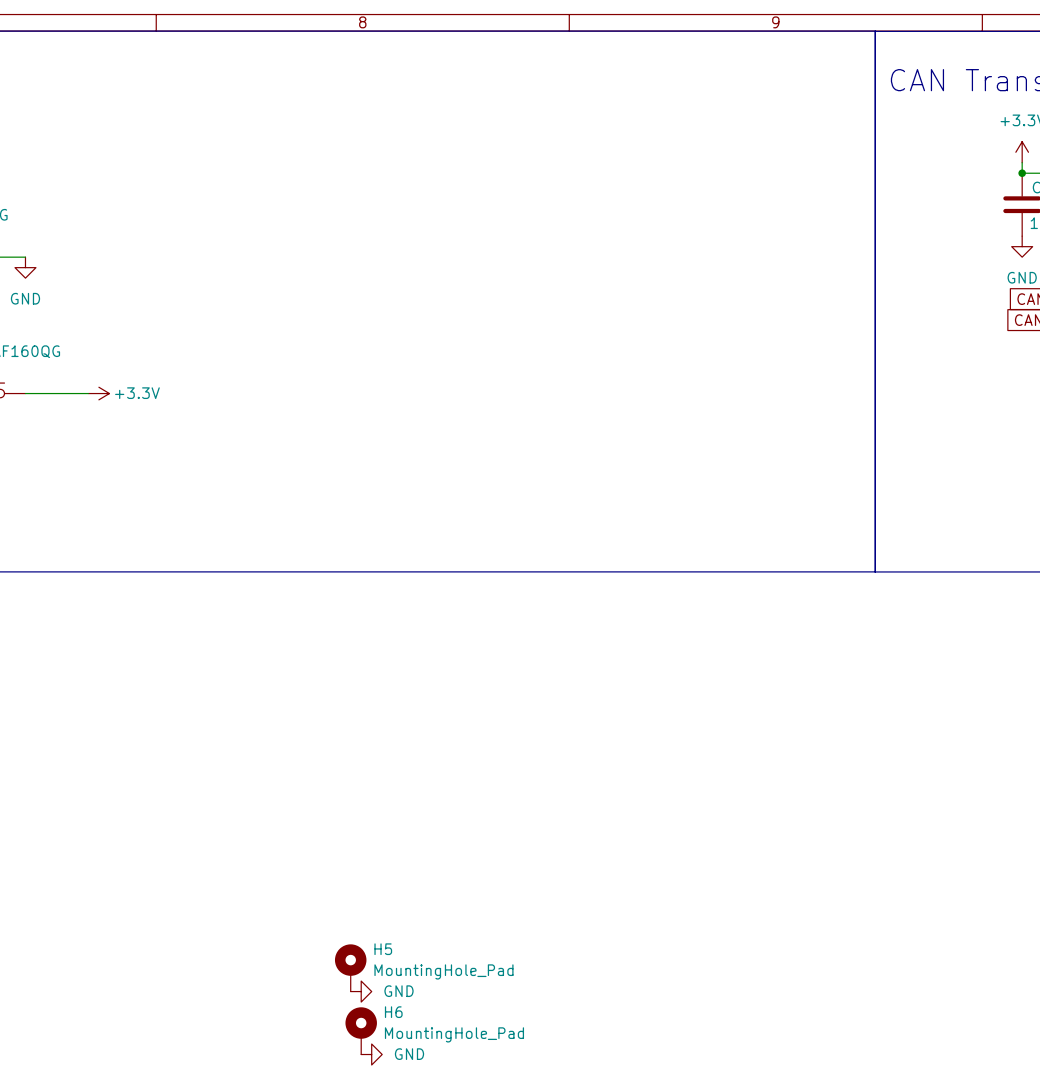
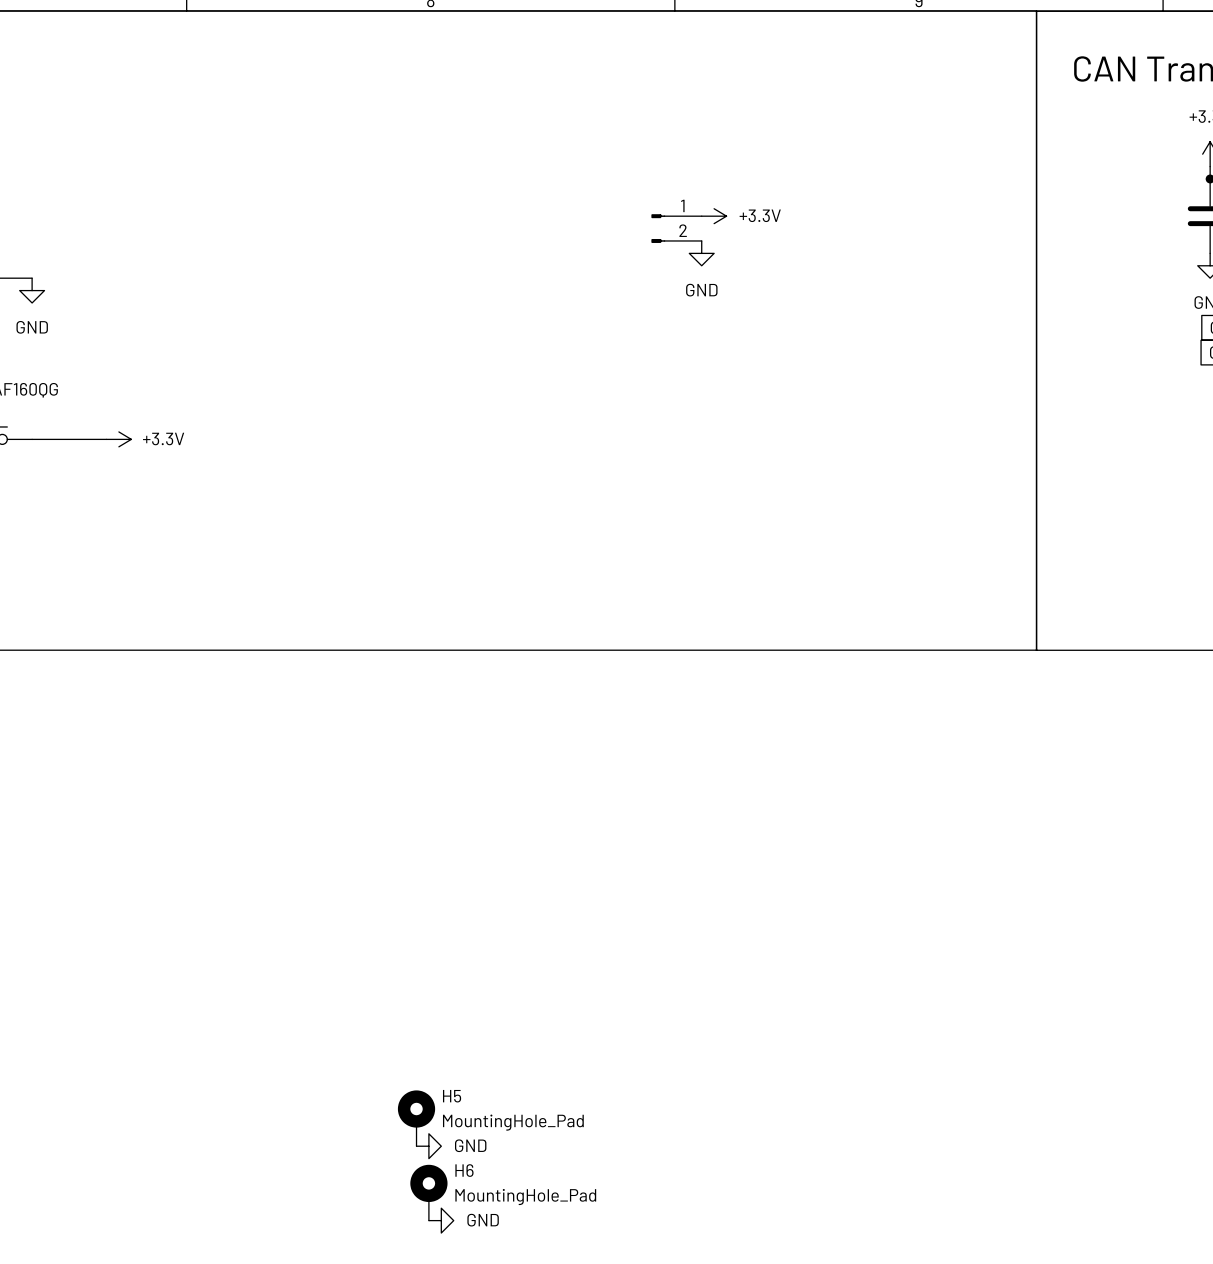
power symbol: none -> +3.3V (714, 216)
part: none -> (676, 228)
power symbol: none -> GND (701, 253)

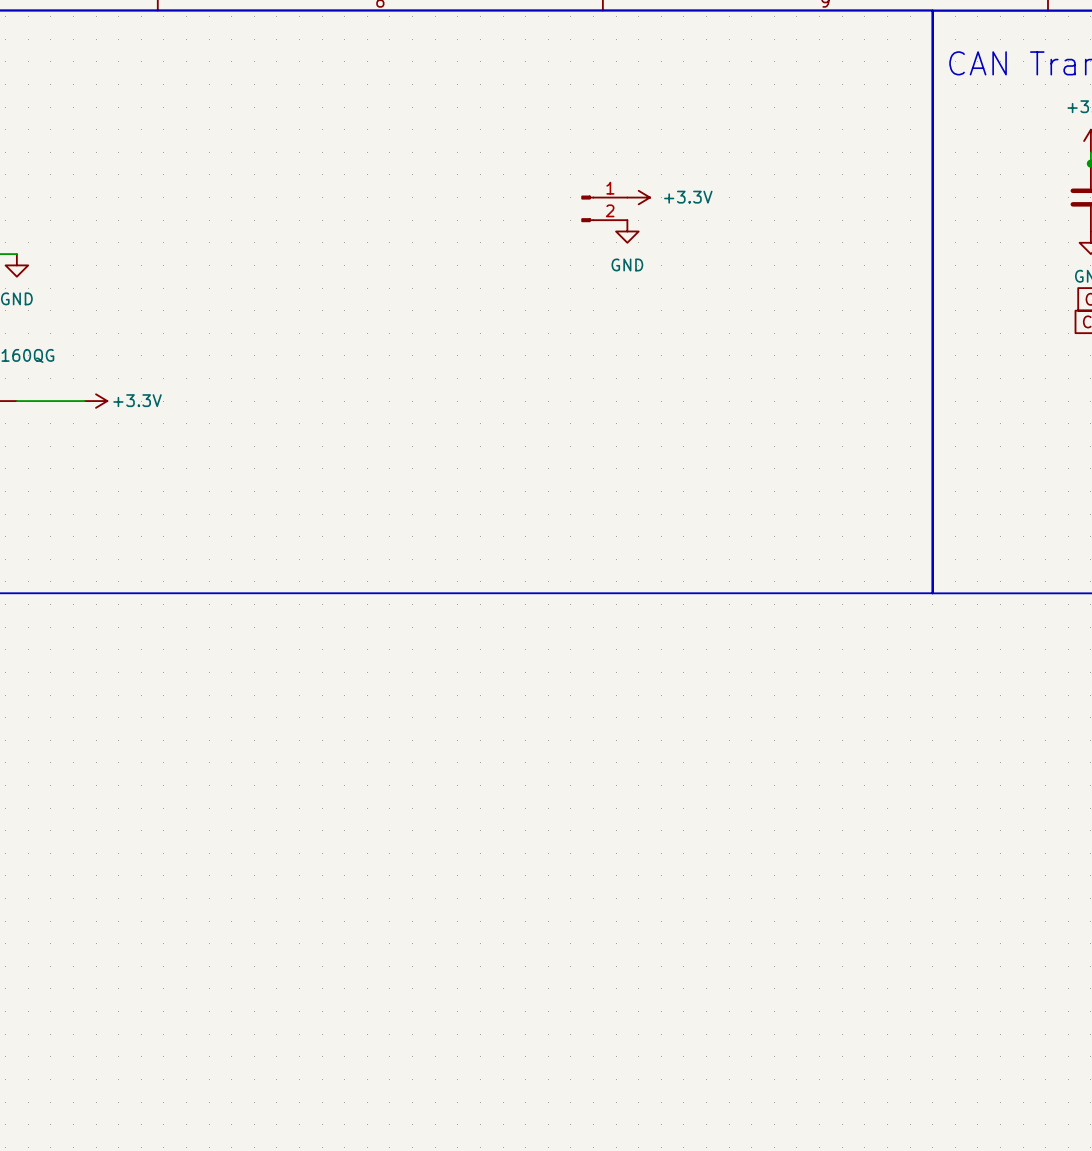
H5: MountingHole_Pad (416, 1118) -> none
power symbol: GND (428, 1146) -> none
H6: MountingHole_Pad (428, 1192) -> none
power symbol: GND (441, 1220) -> none

